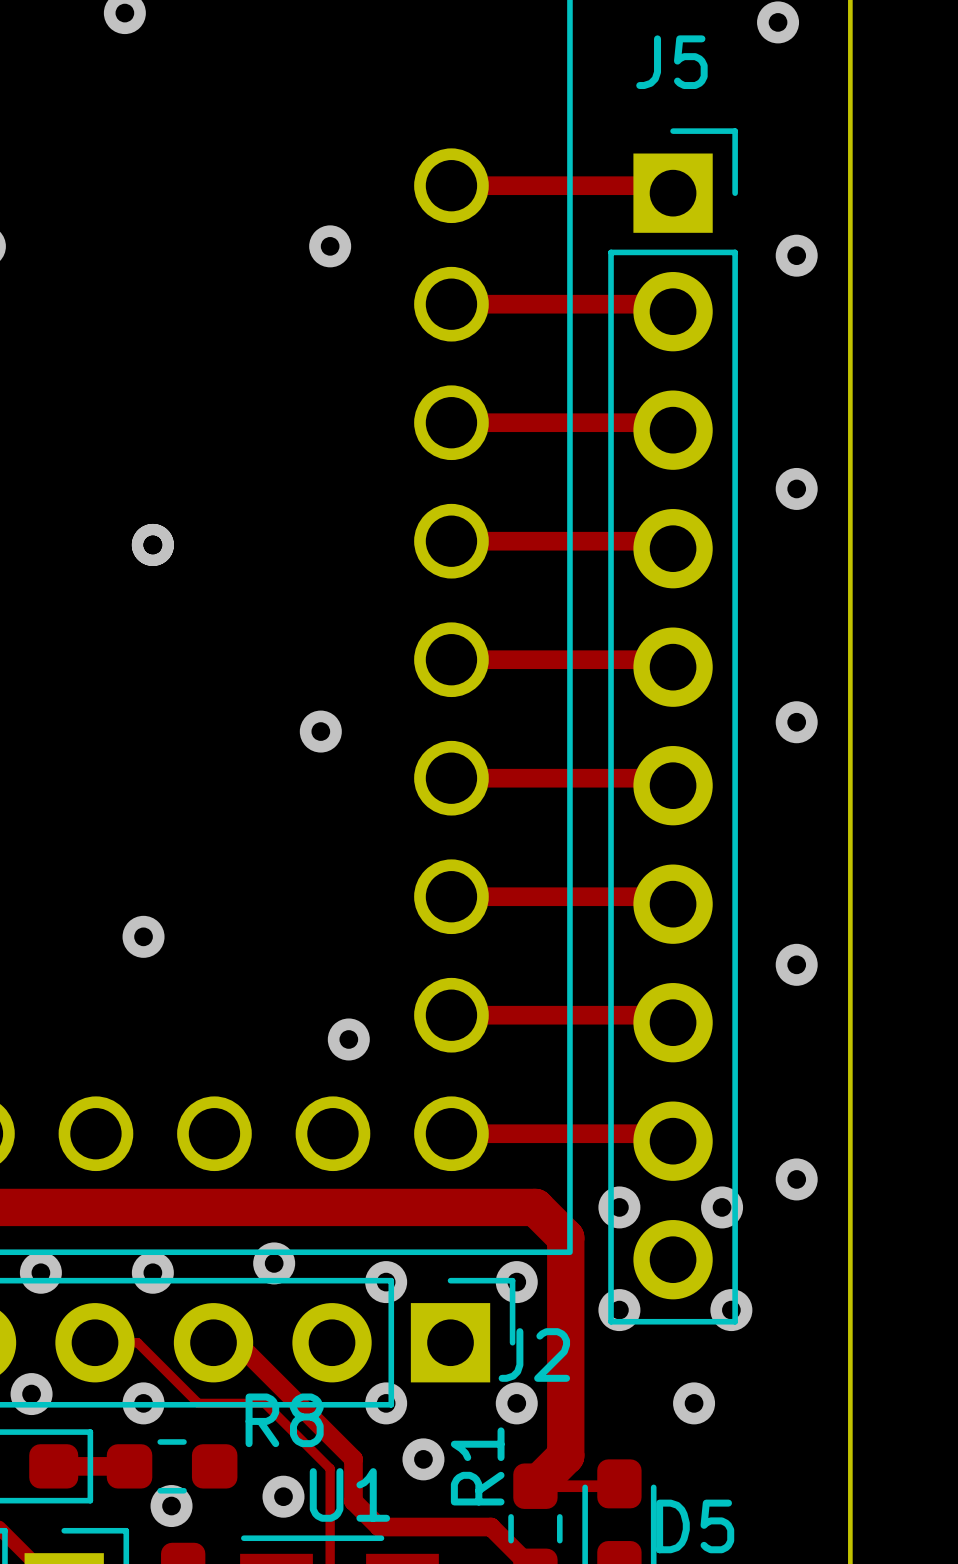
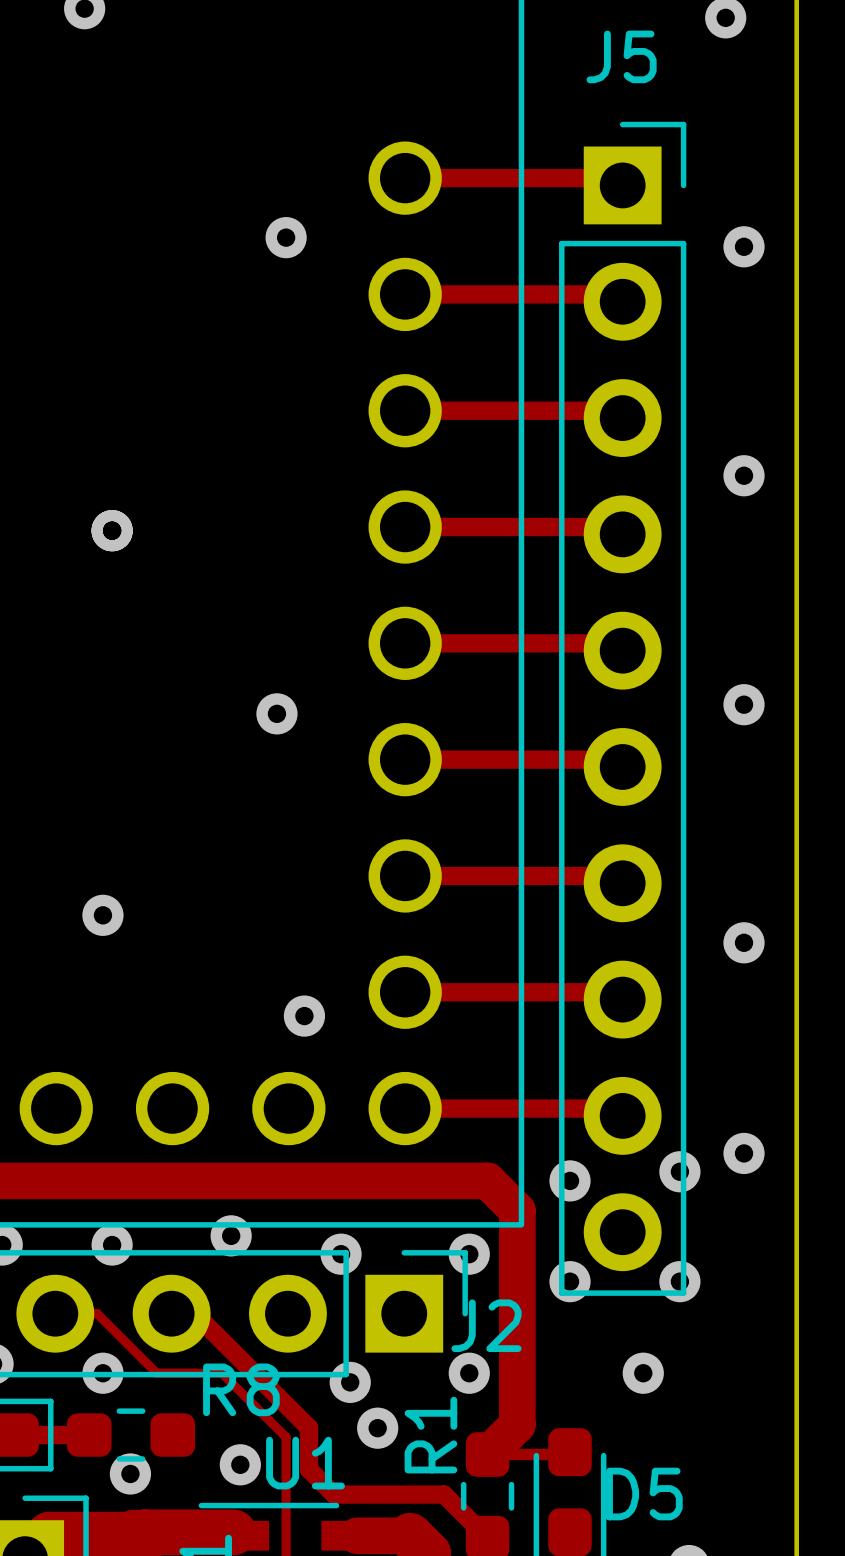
via position: (722, 1207) -> (679, 1171)
via position: (386, 1403) -> (350, 1382)

